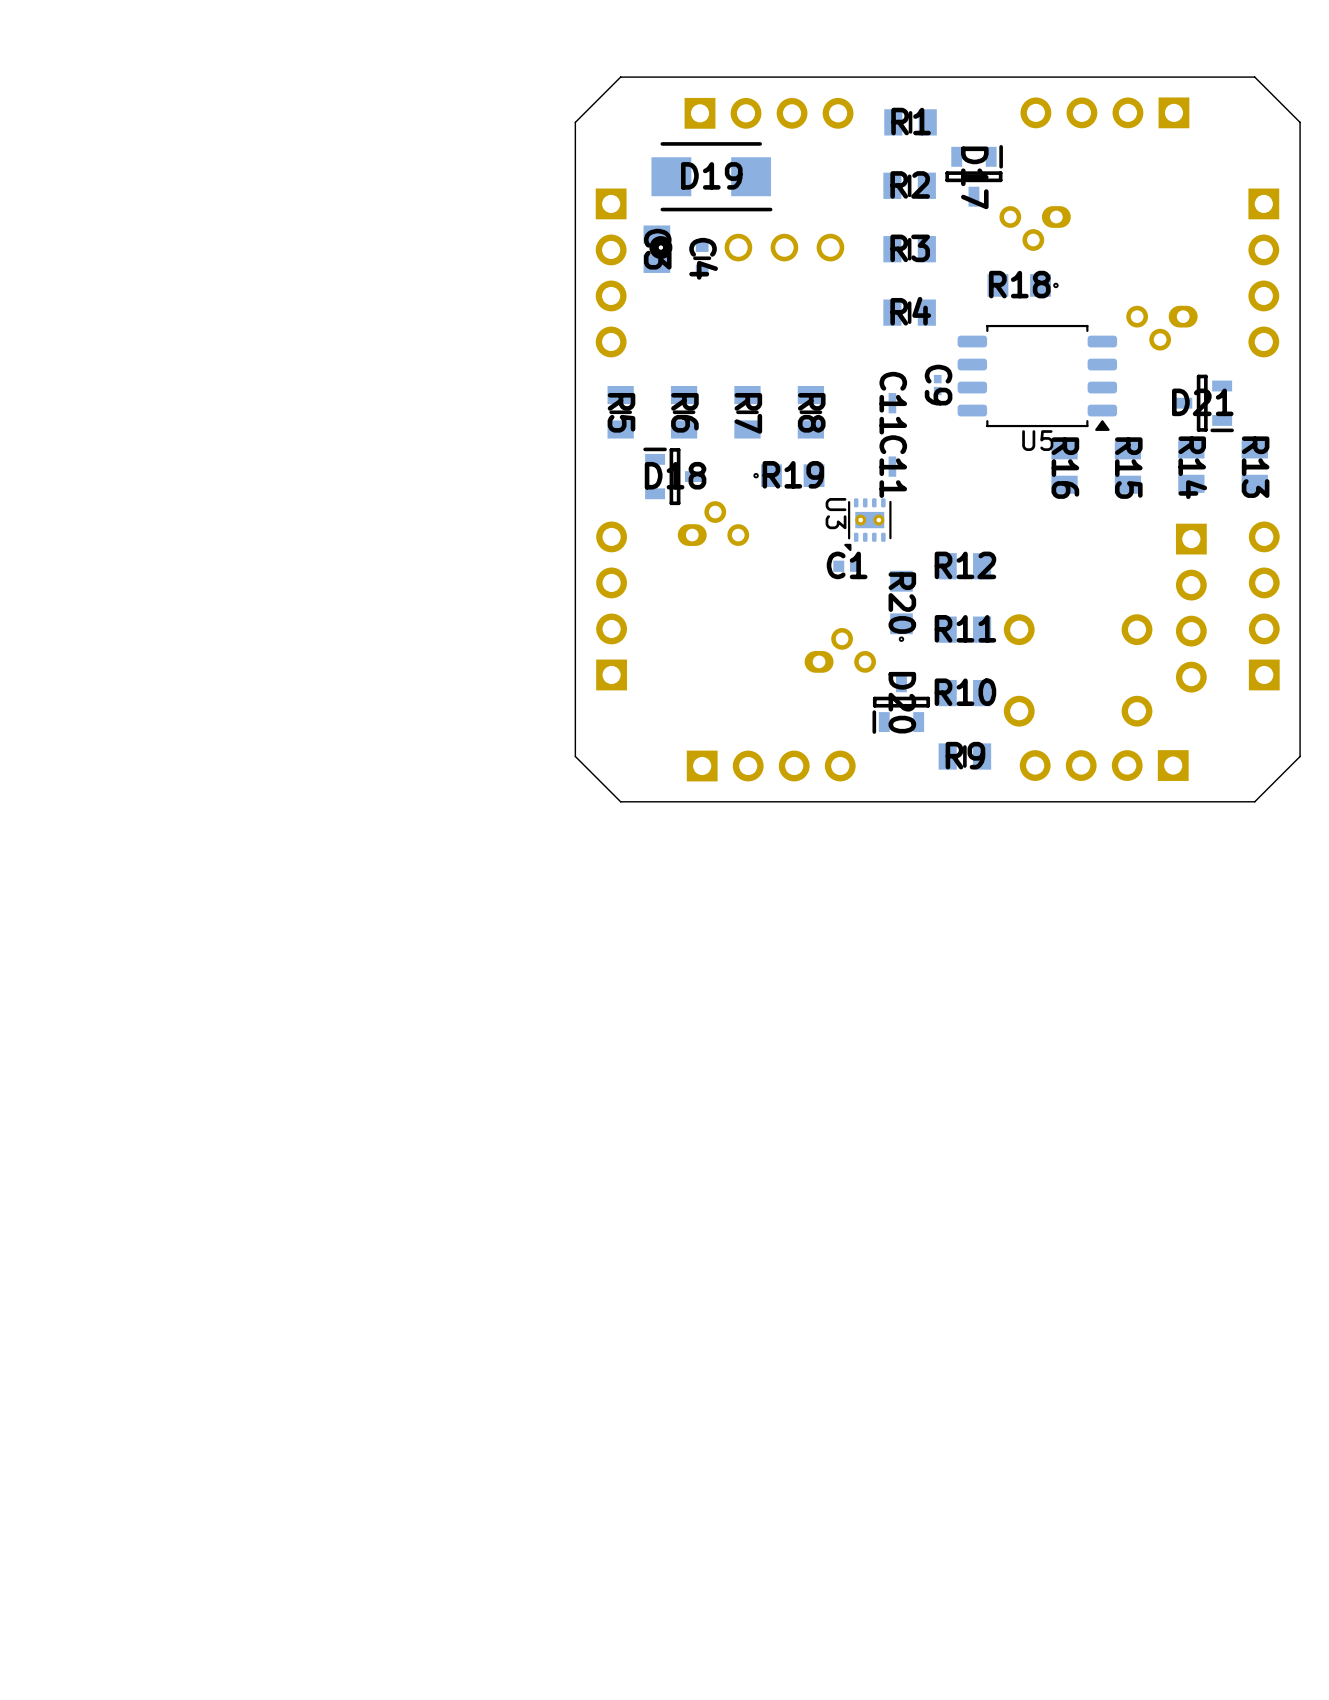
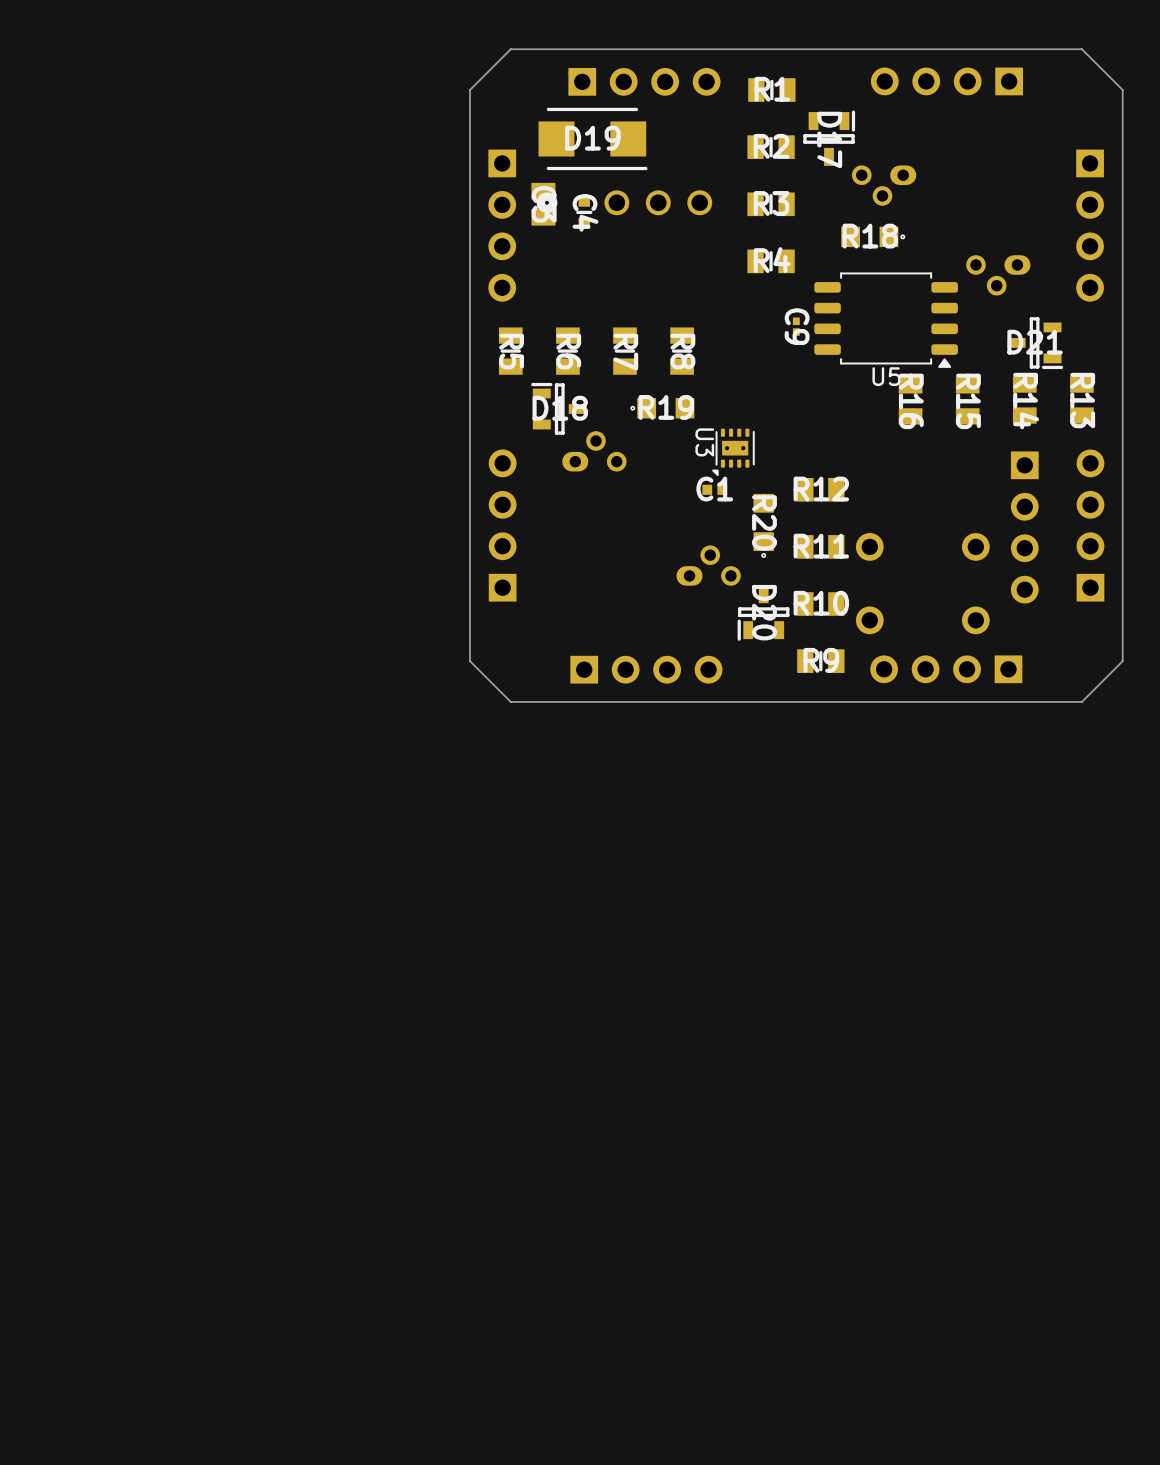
C11: (892, 403) -> none
C11: (892, 466) -> none

